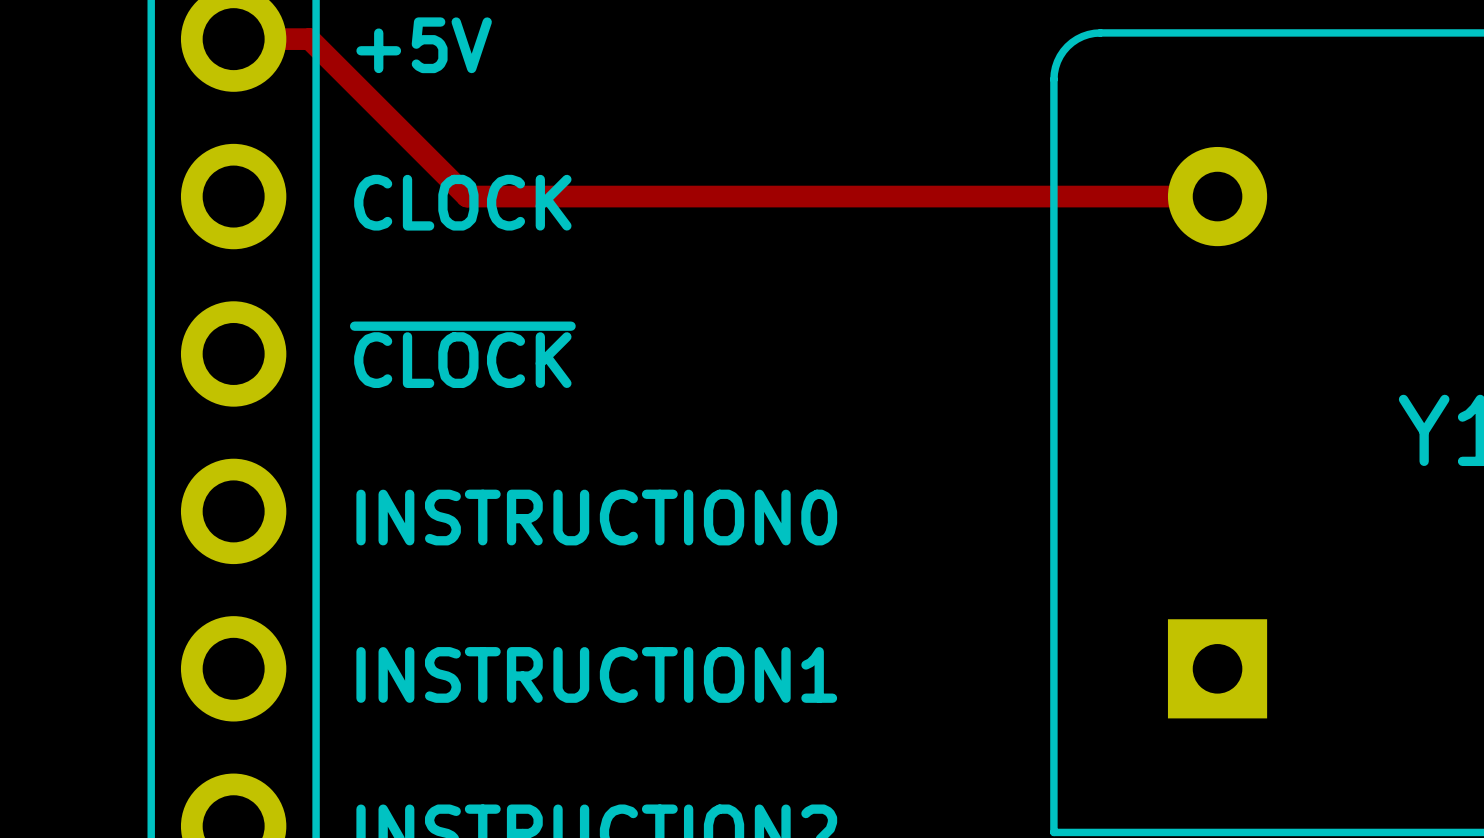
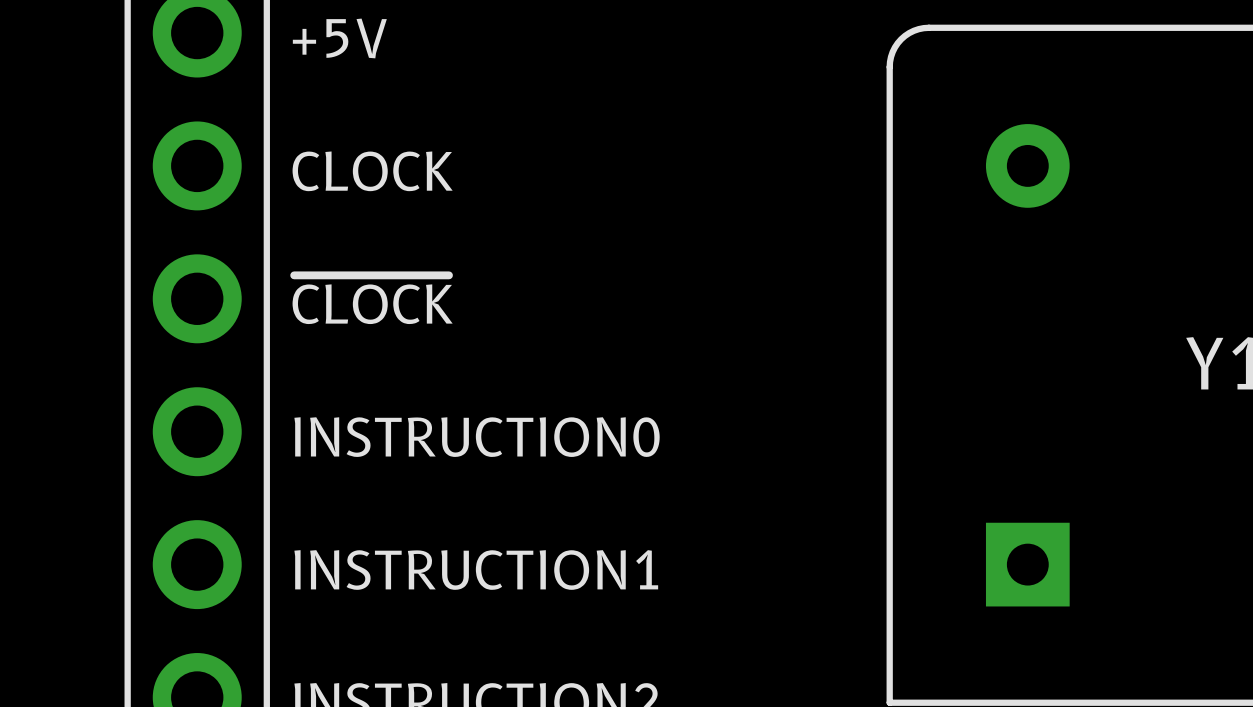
track: (233, 39) (309, 39) (467, 196) (1217, 196) -> none

